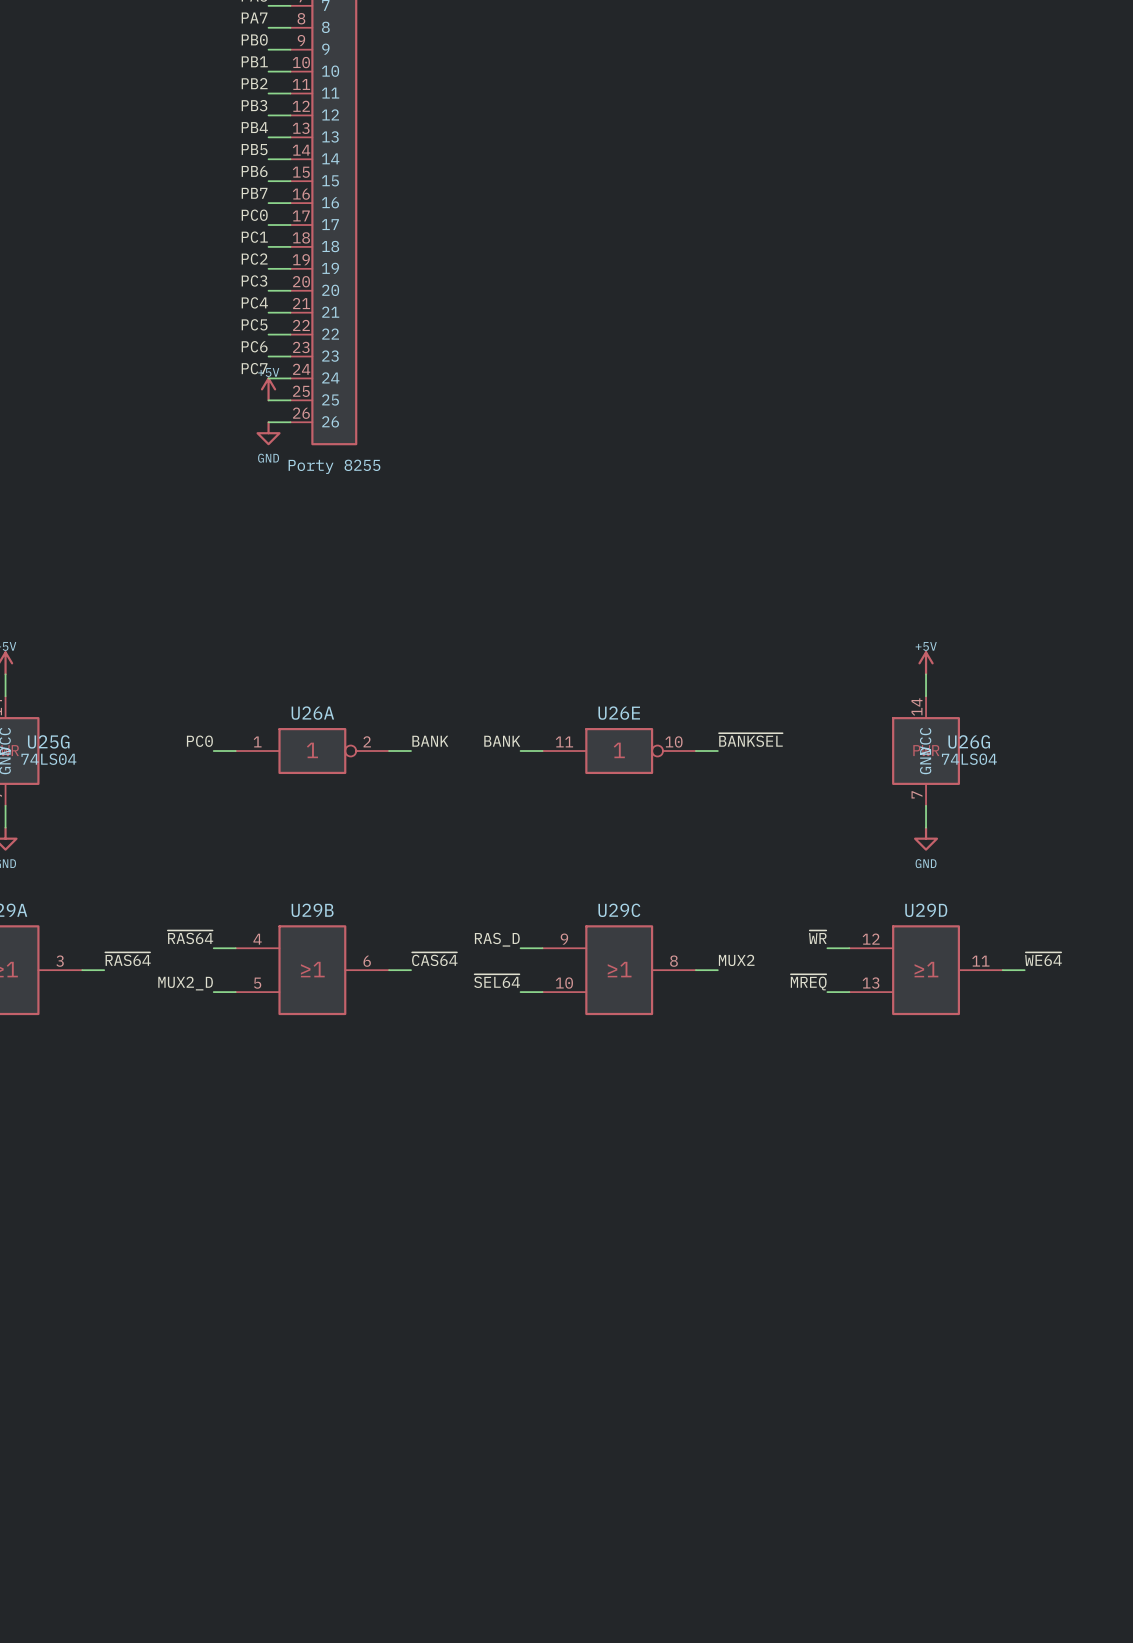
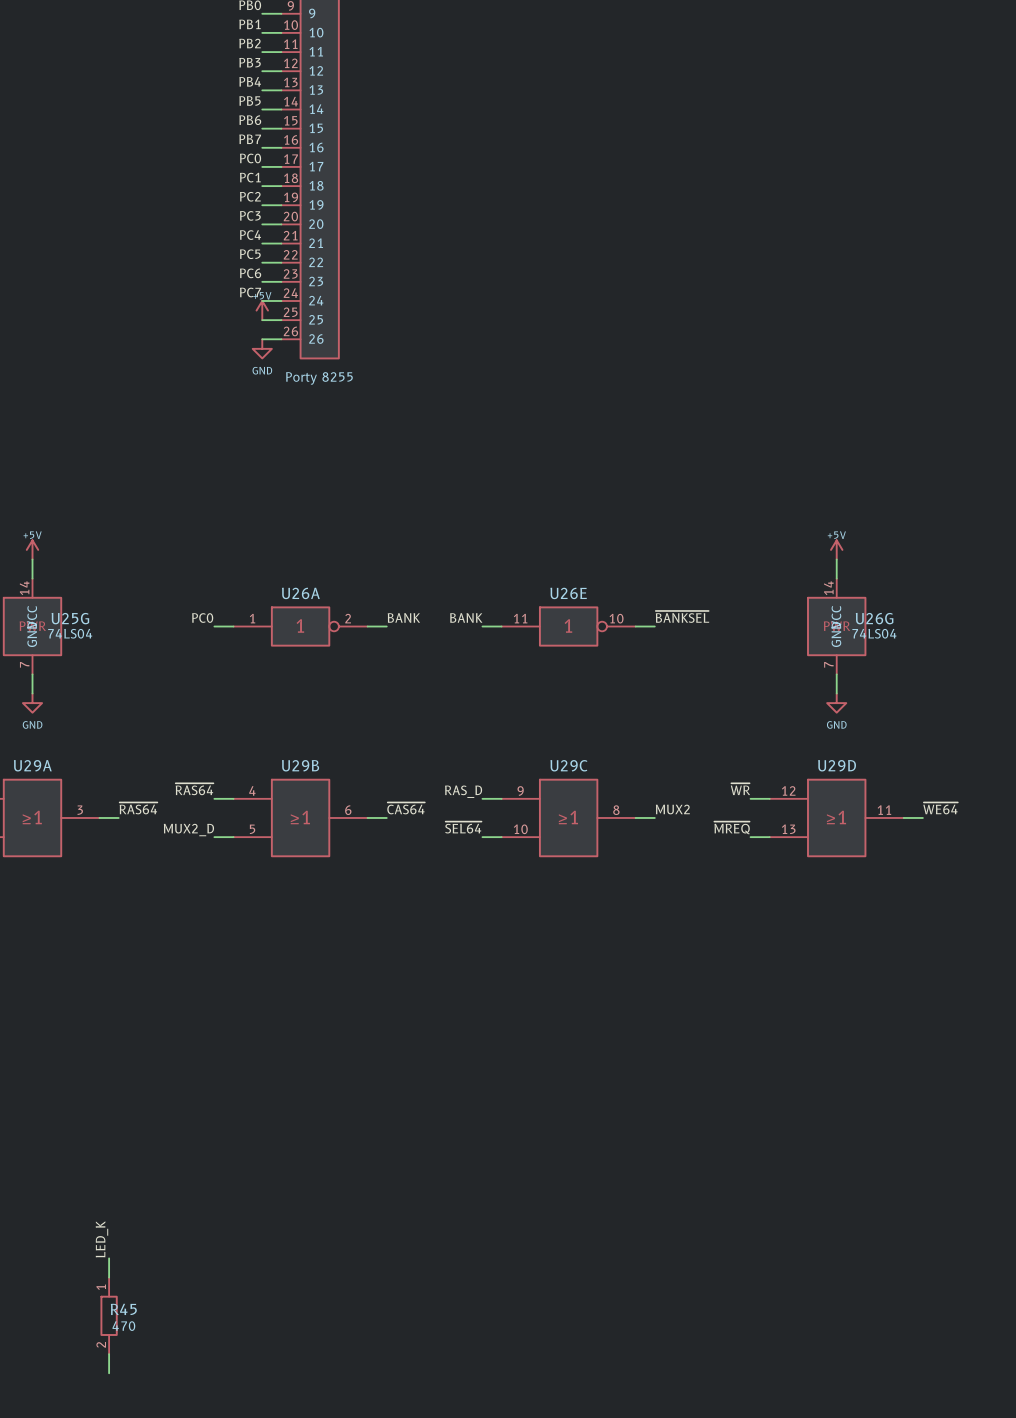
label: none -> LED_K (101, 1239)
wire: none -> (109, 1258) (109, 1277)
R45: none -> 470 (109, 1315)
wire: none -> (109, 1354) (109, 1373)

